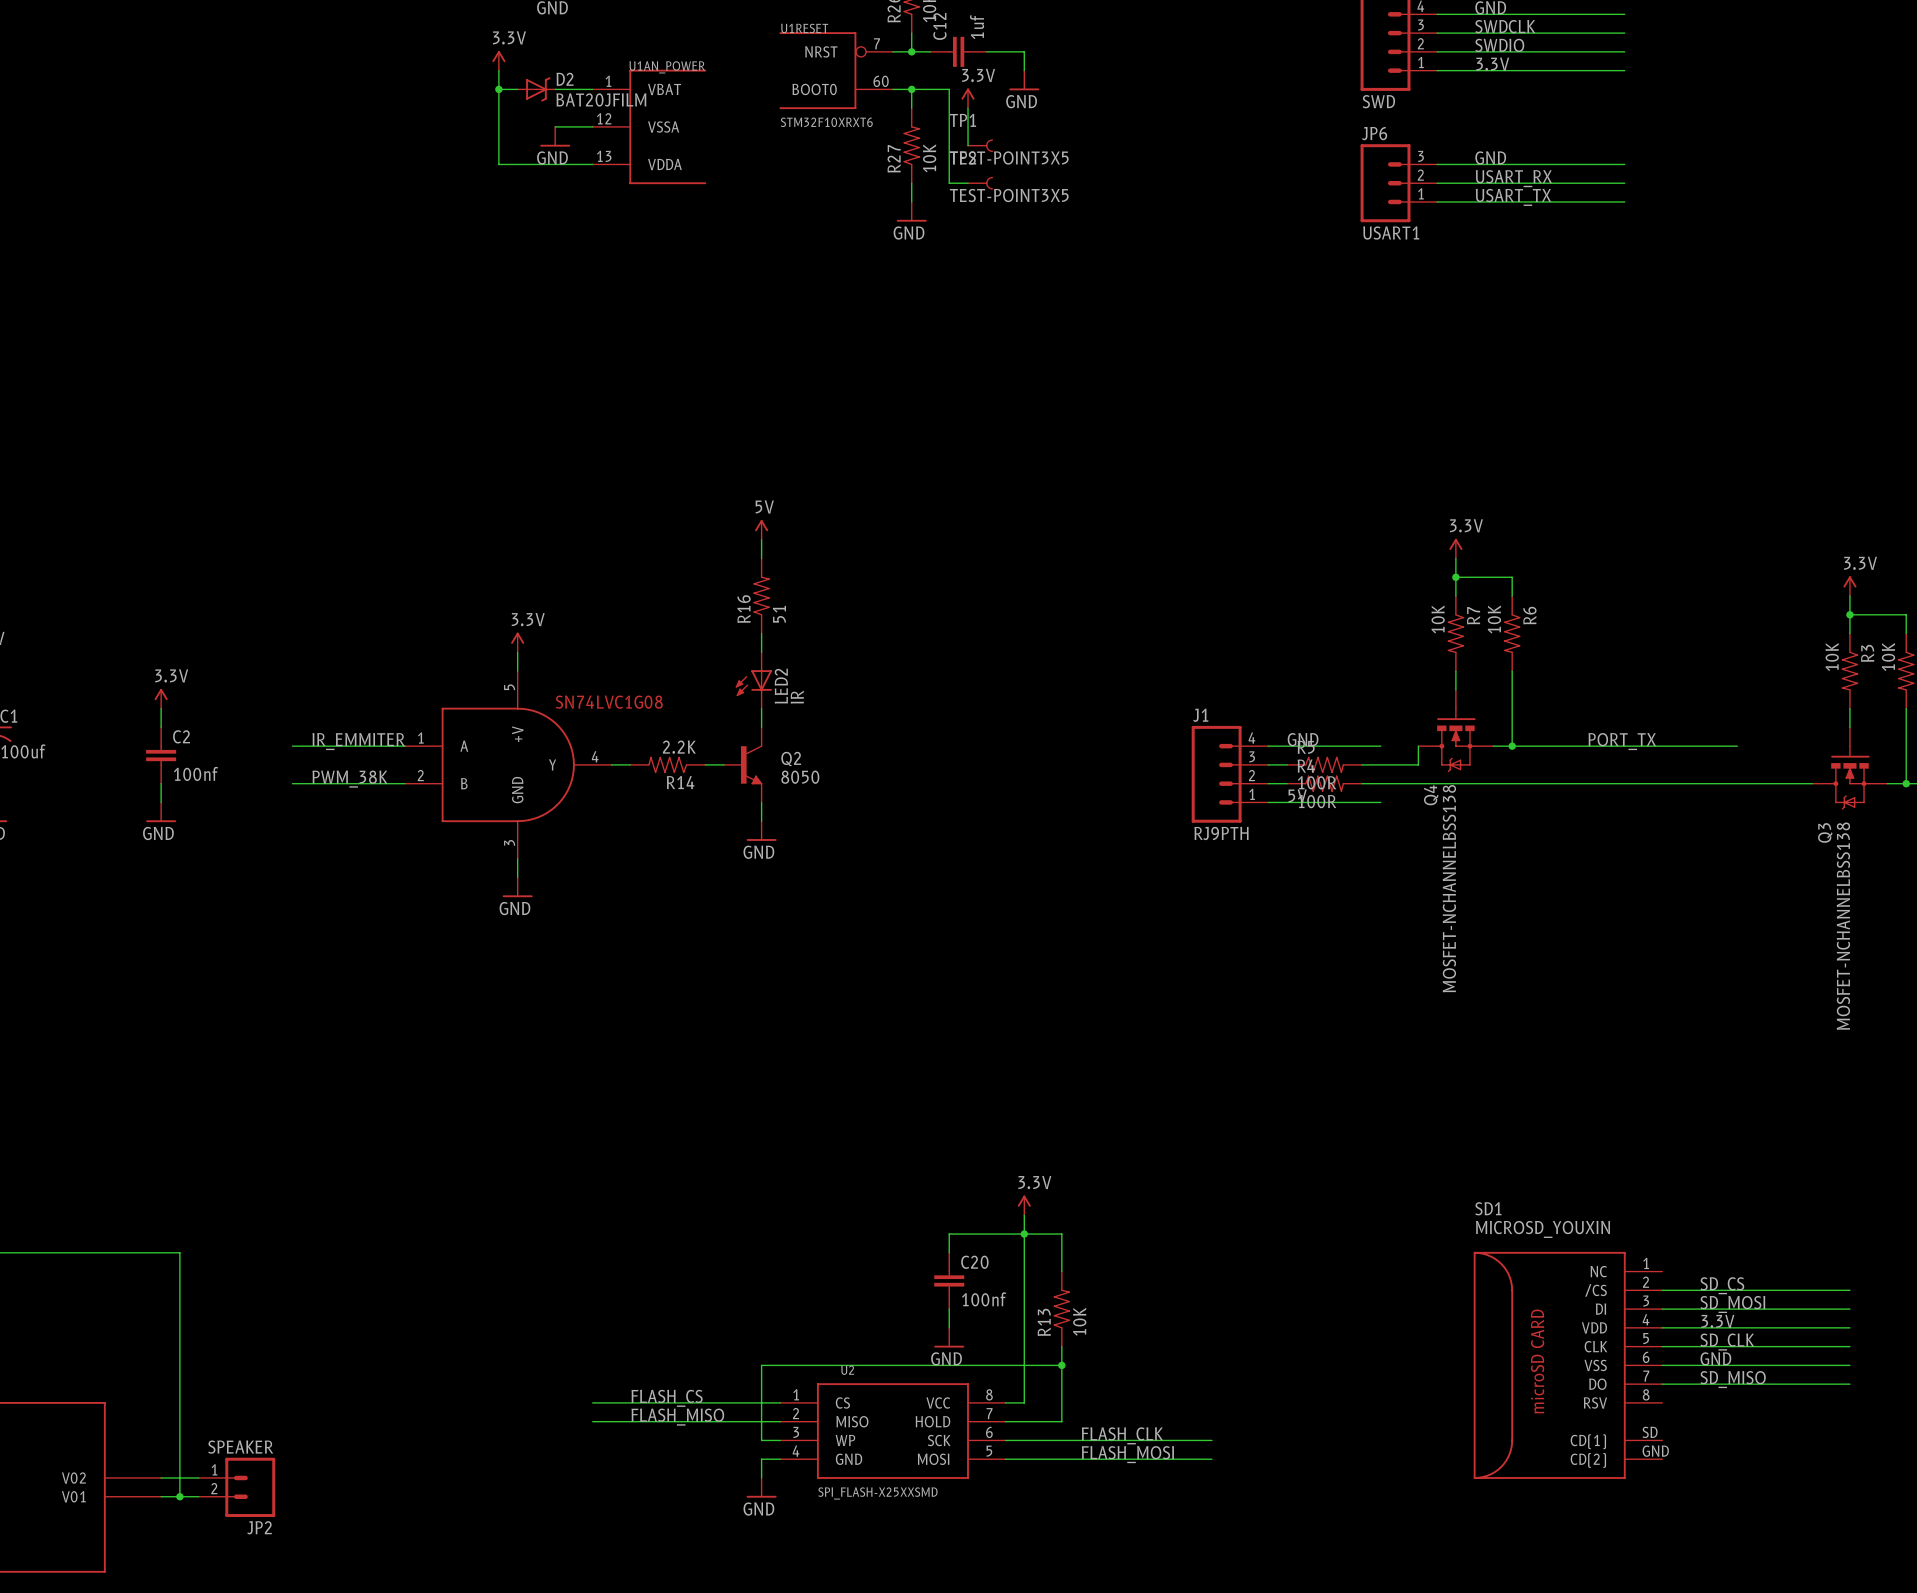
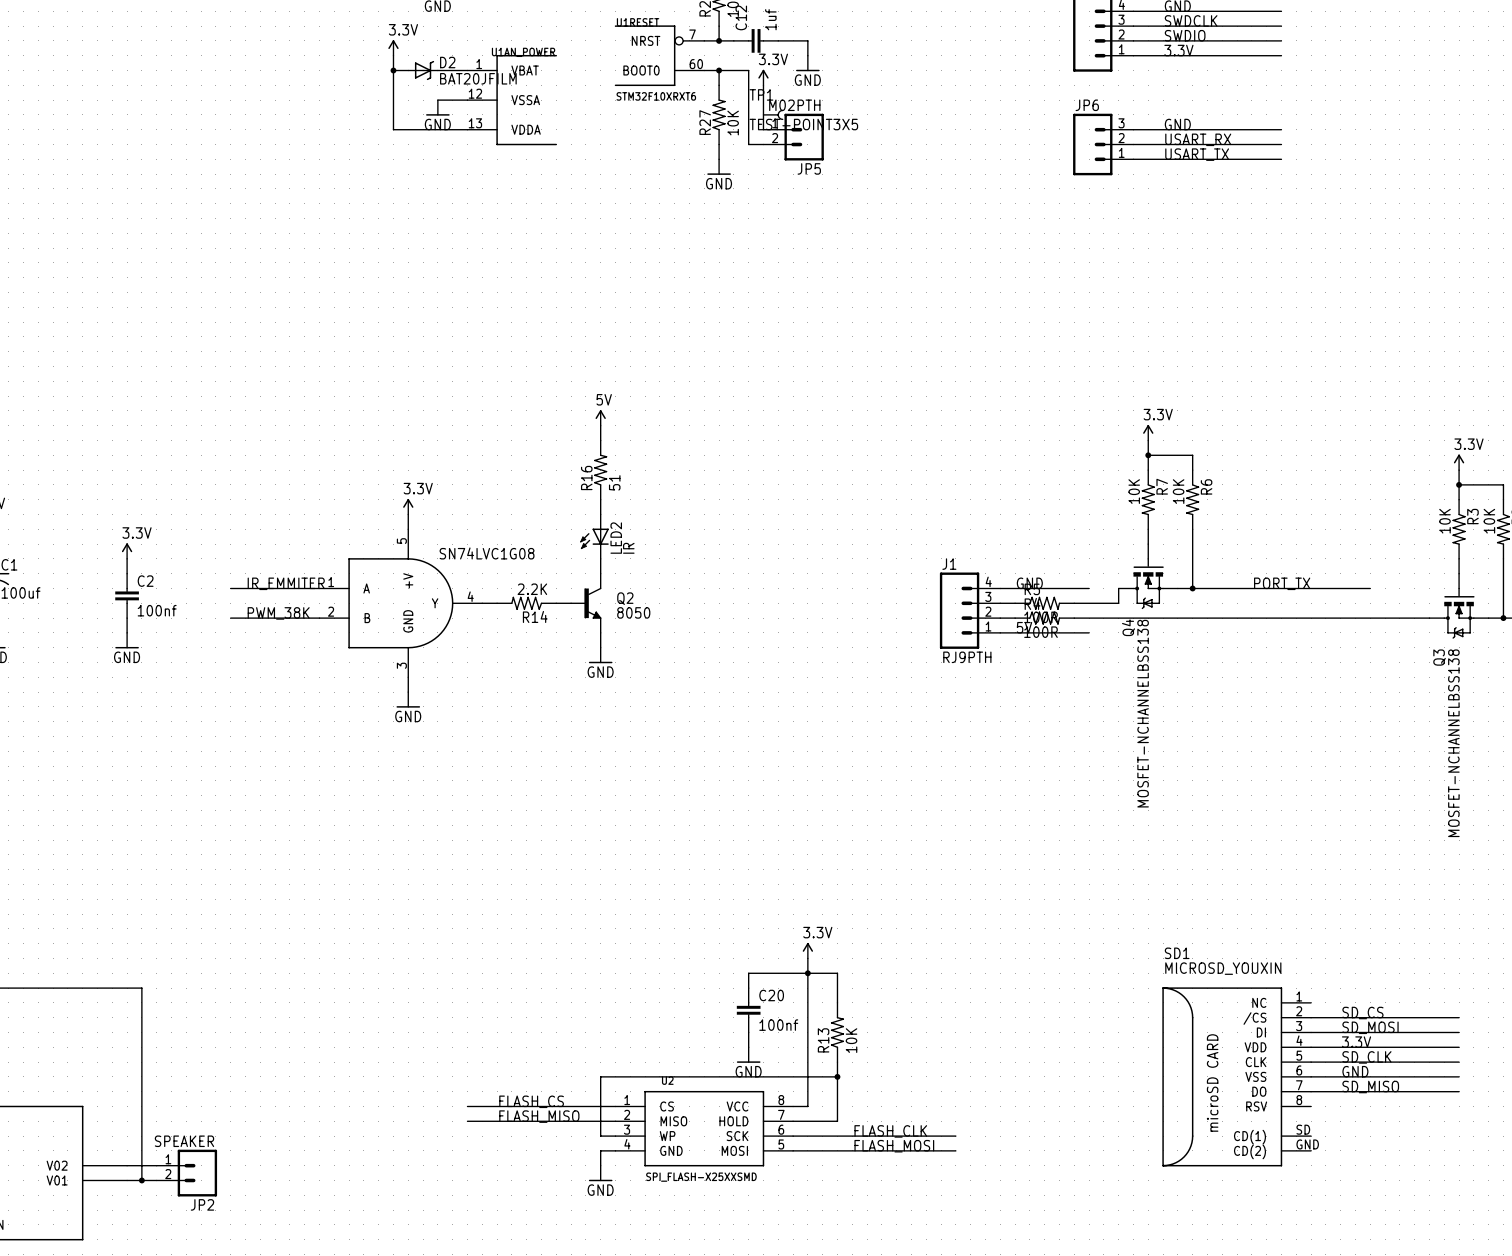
part value: SWD (1378, 101) -> none
wire: none -> (763, 114) (763, 129)
JP5: none -> M02PTH (793, 137)
part: TEST-POINT3X5 (980, 183) -> none
JP6 value: USART1 (1391, 233) -> none

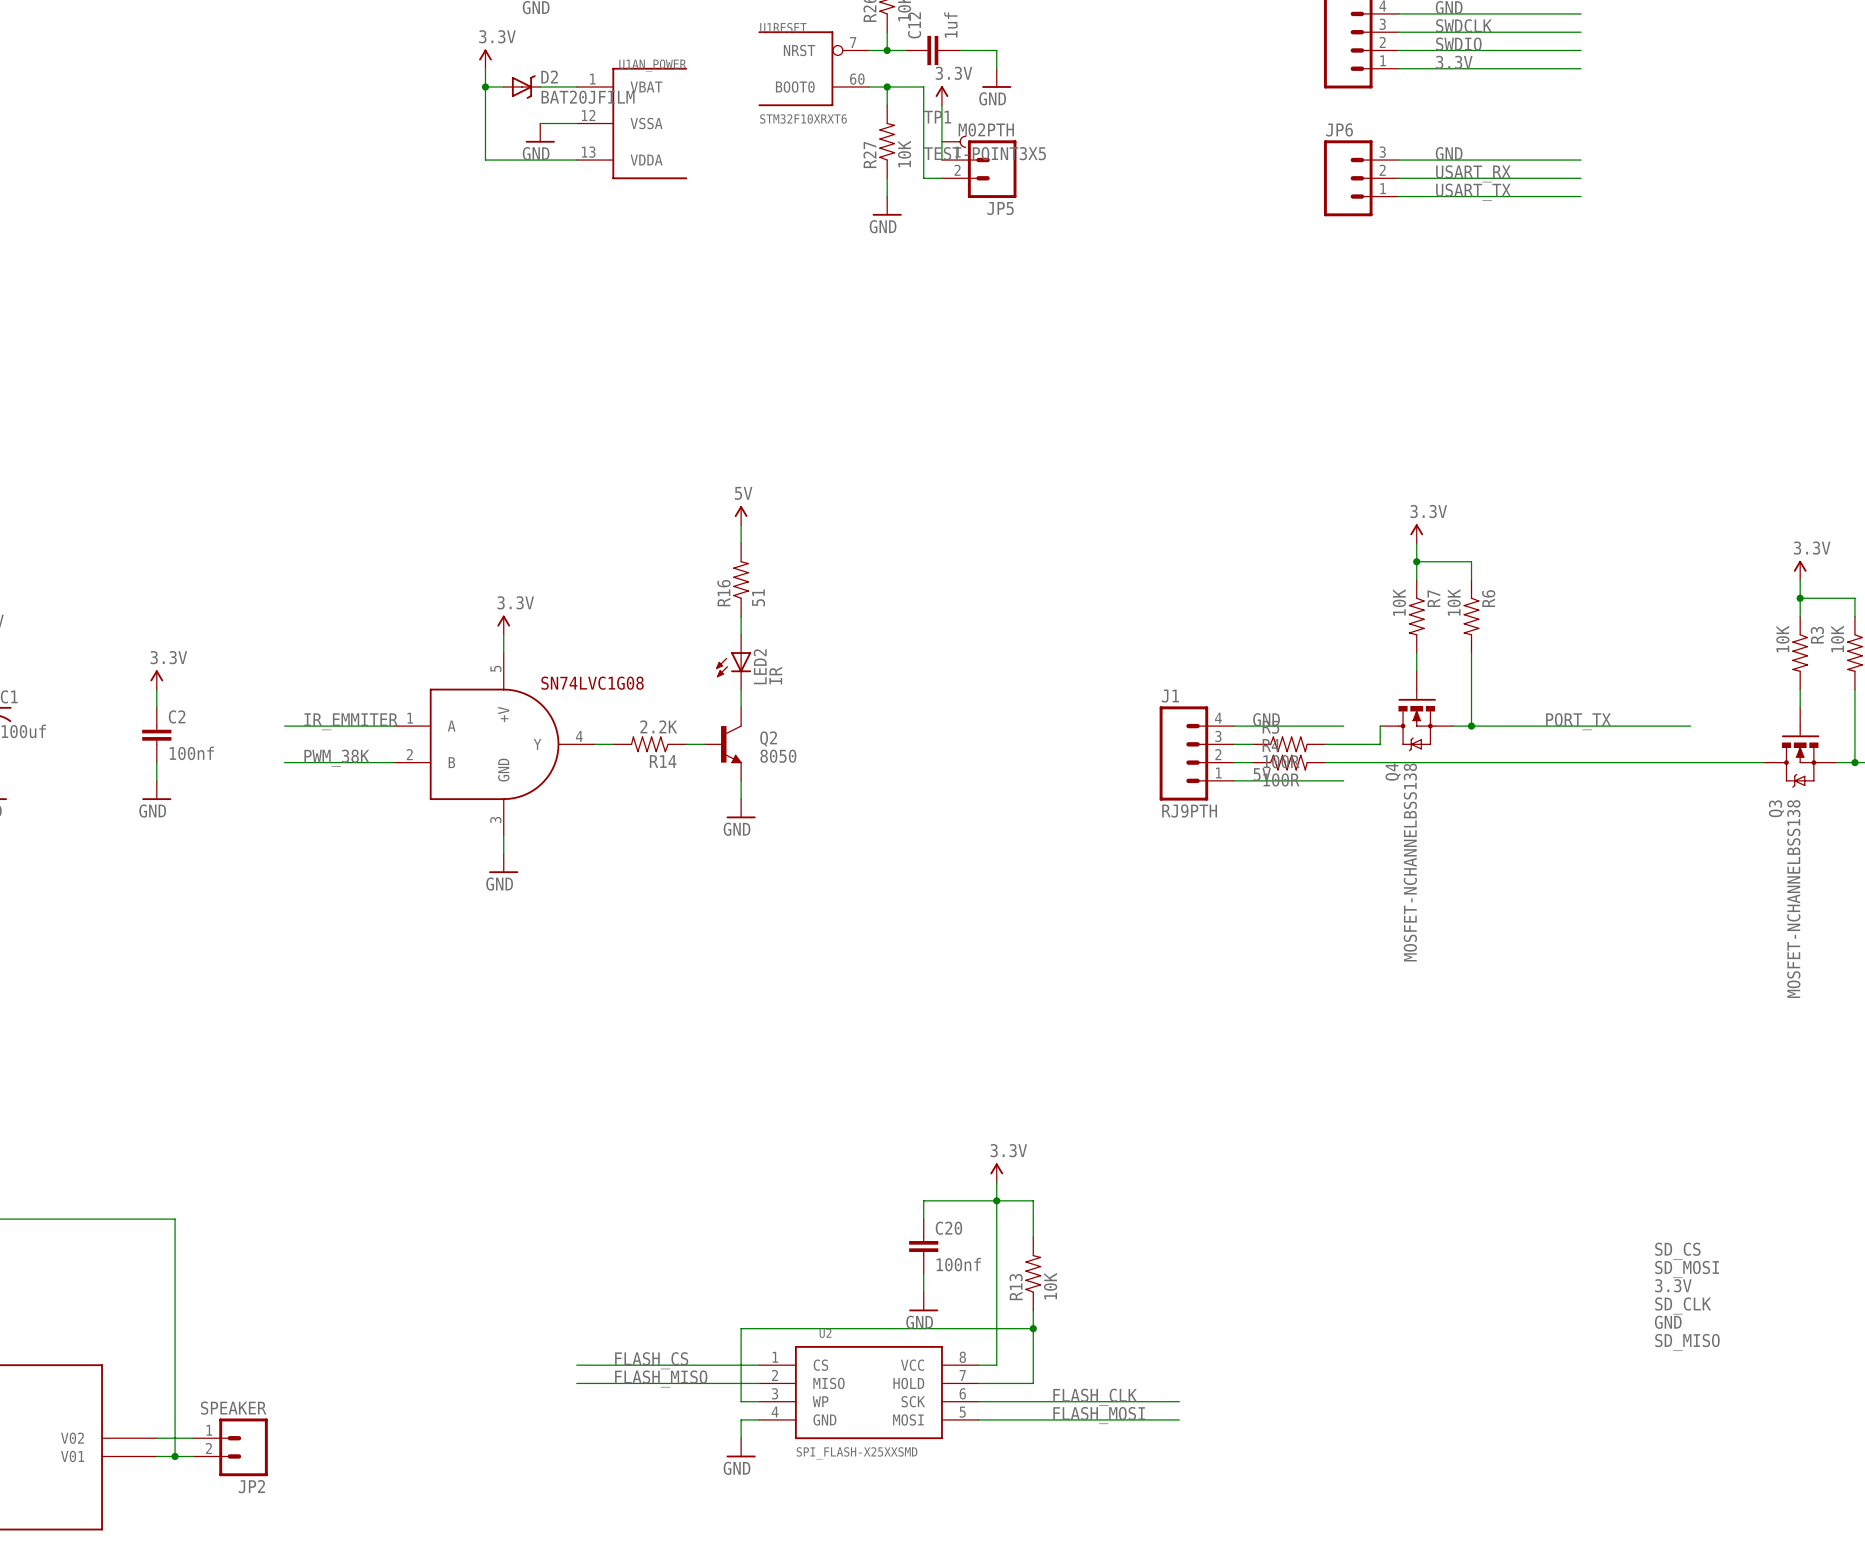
wire: (1311, 1017) (1459, 1017) -> none
wire: (1311, 1032) (1459, 1032) -> none
wire: (1311, 1047) (1459, 1047) -> none
wire: (1311, 1062) (1459, 1062) -> none
SD1: MICROSD_YOUXIN (1236, 1076) -> none
wire: (1311, 1076) (1459, 1076) -> none
wire: (1311, 1091) (1459, 1091) -> none

